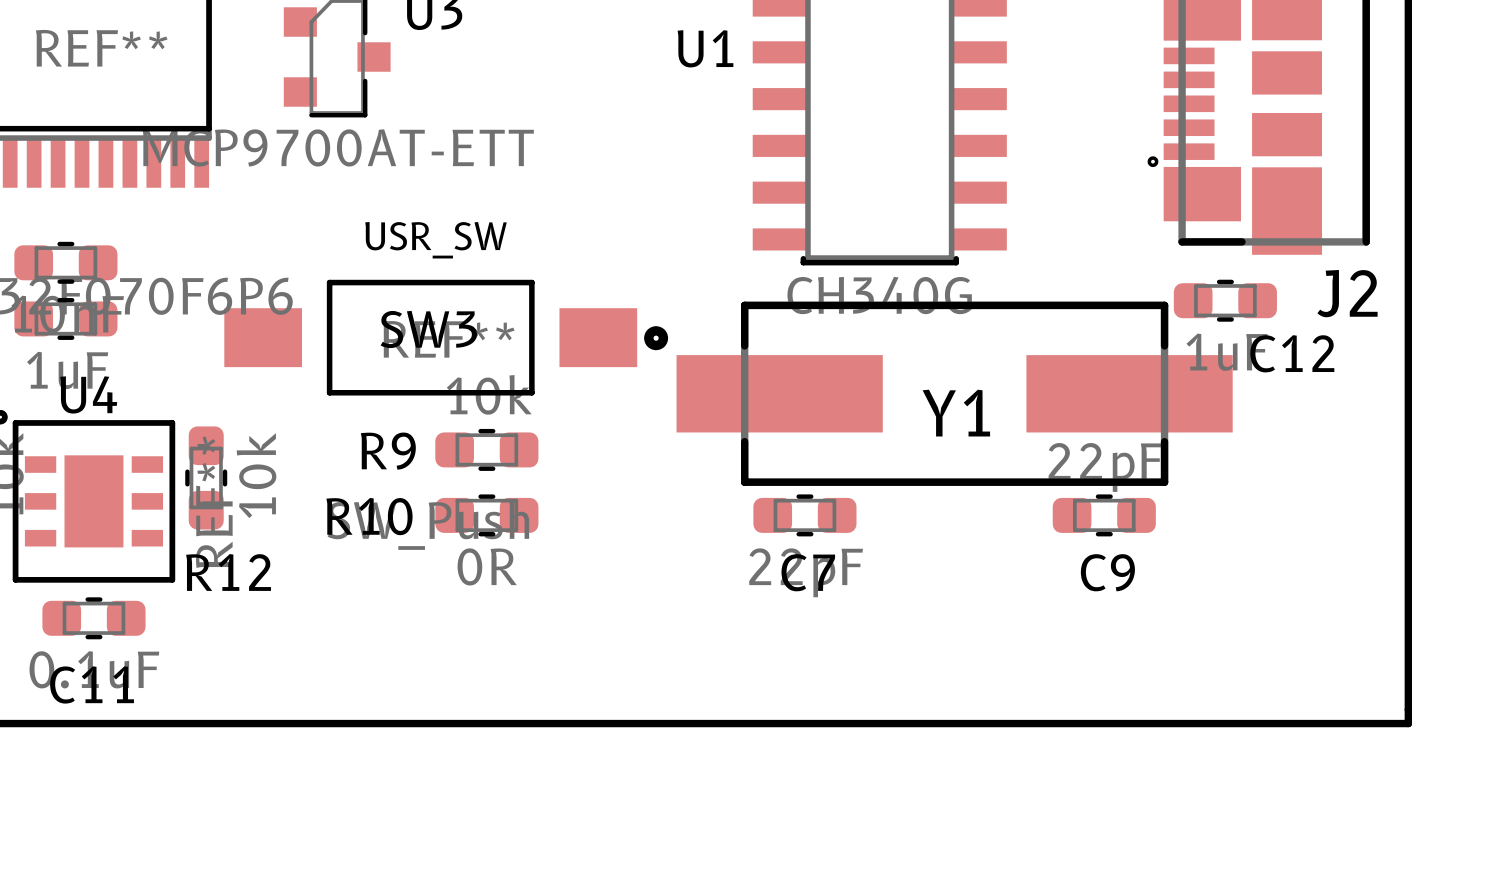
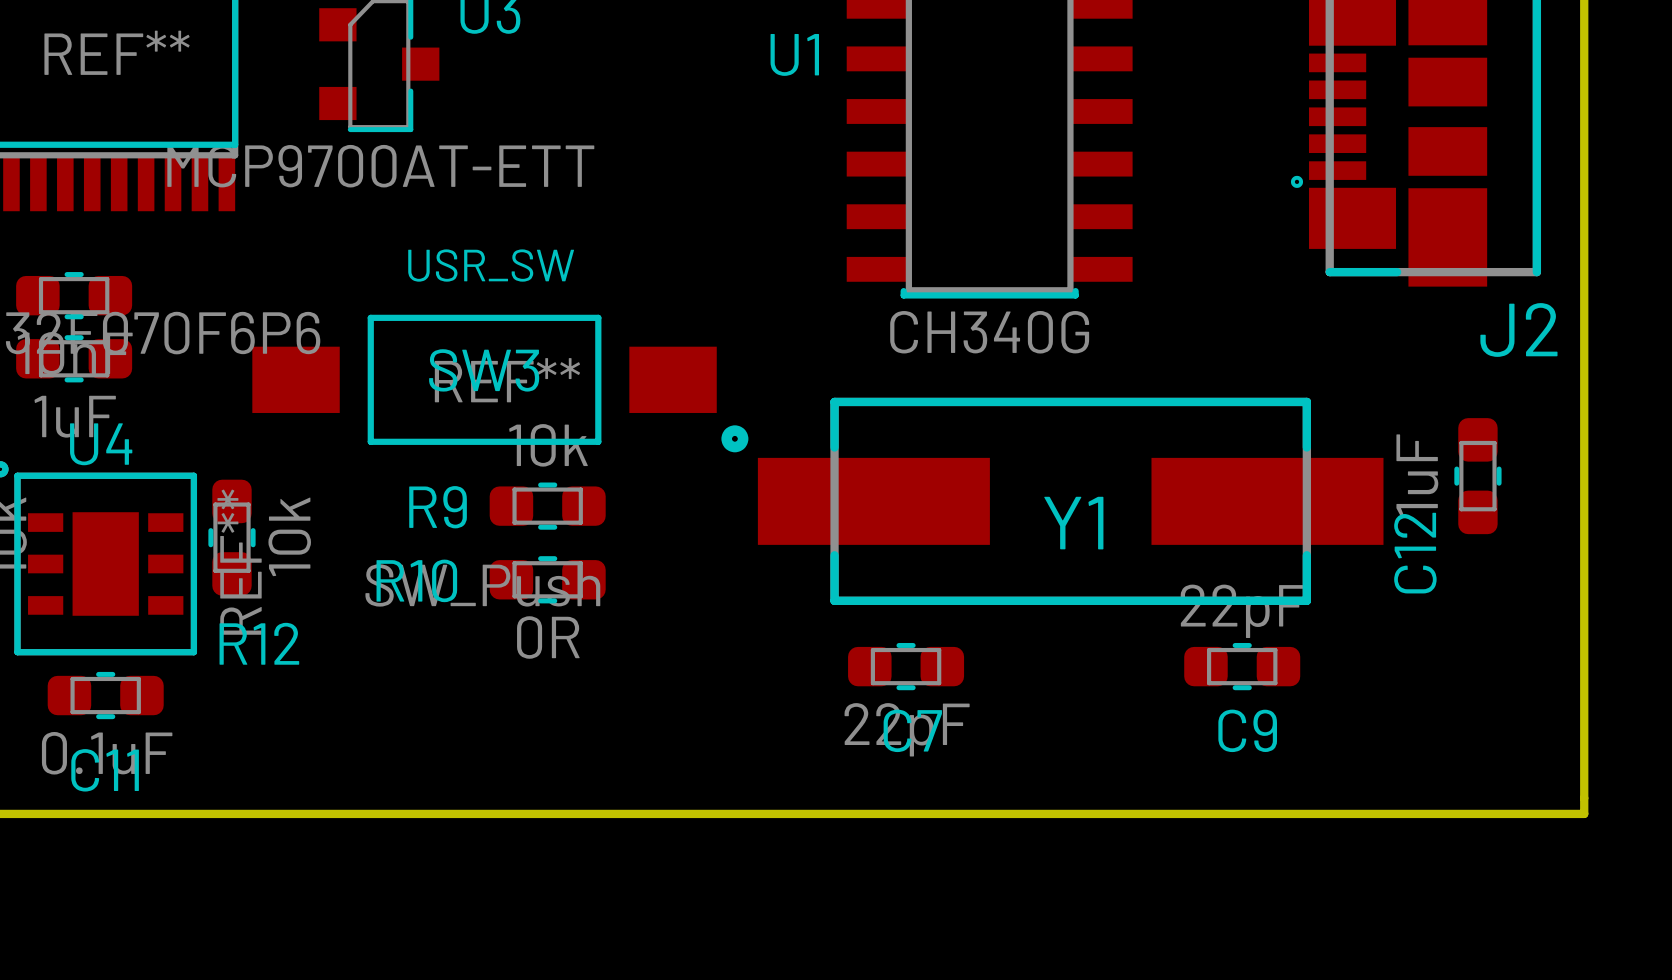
C12 rotation: 0° (1225, 300) -> 90° clockwise (1477, 476)
C12 position: (1225, 300) -> (1477, 476)
Y1 position: (938, 393) -> (1052, 501)
C7 position: (804, 515) -> (906, 666)
C9 position: (1104, 515) -> (1242, 666)

